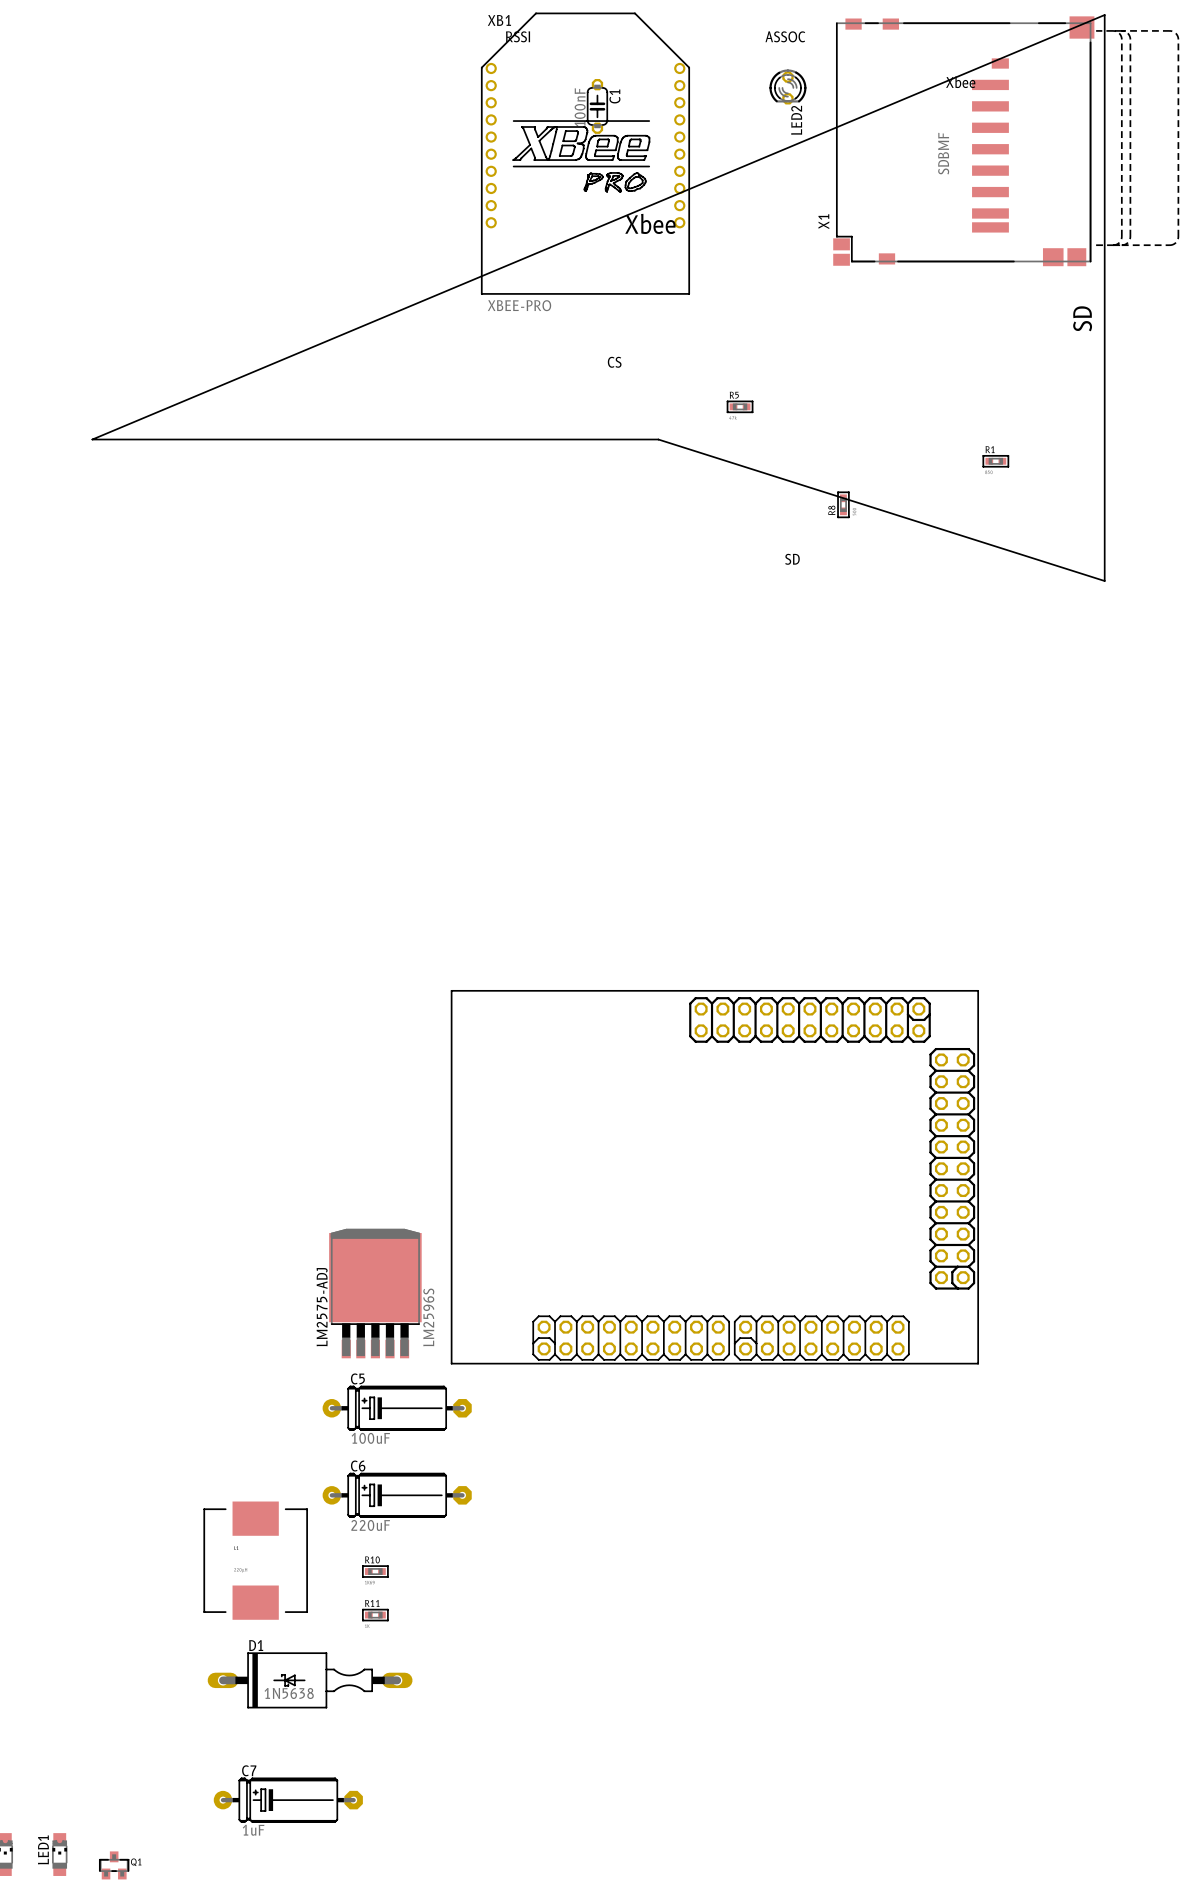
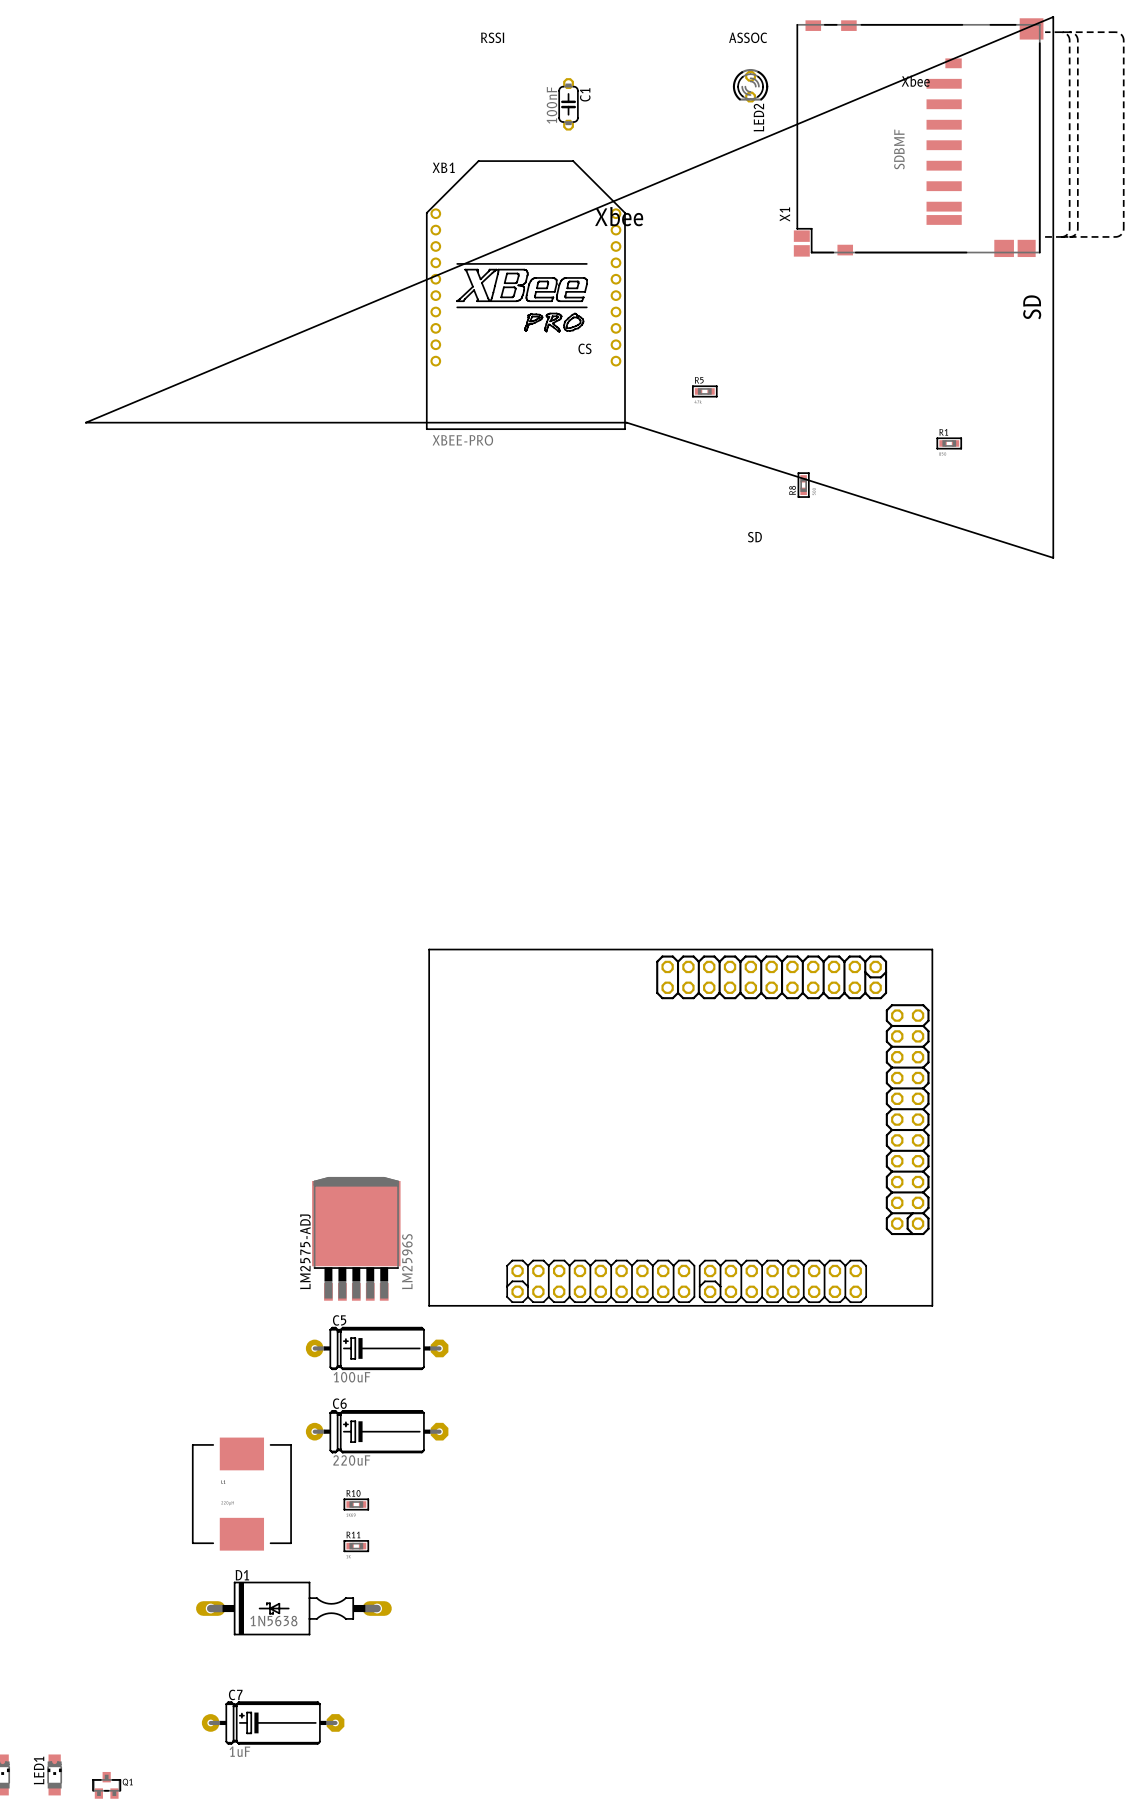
XB1 position: (585, 153) -> (525, 295)

